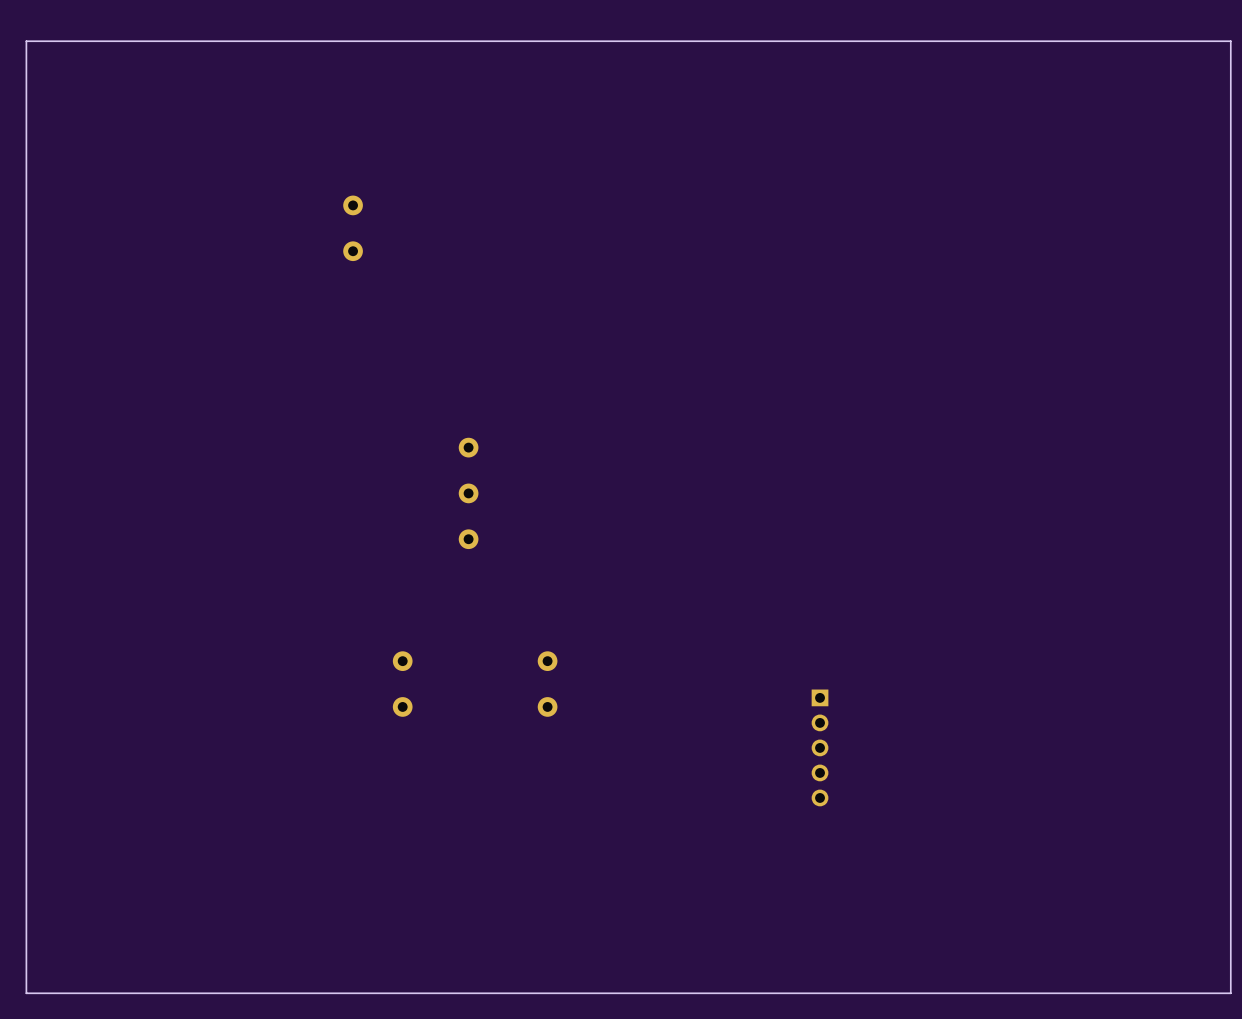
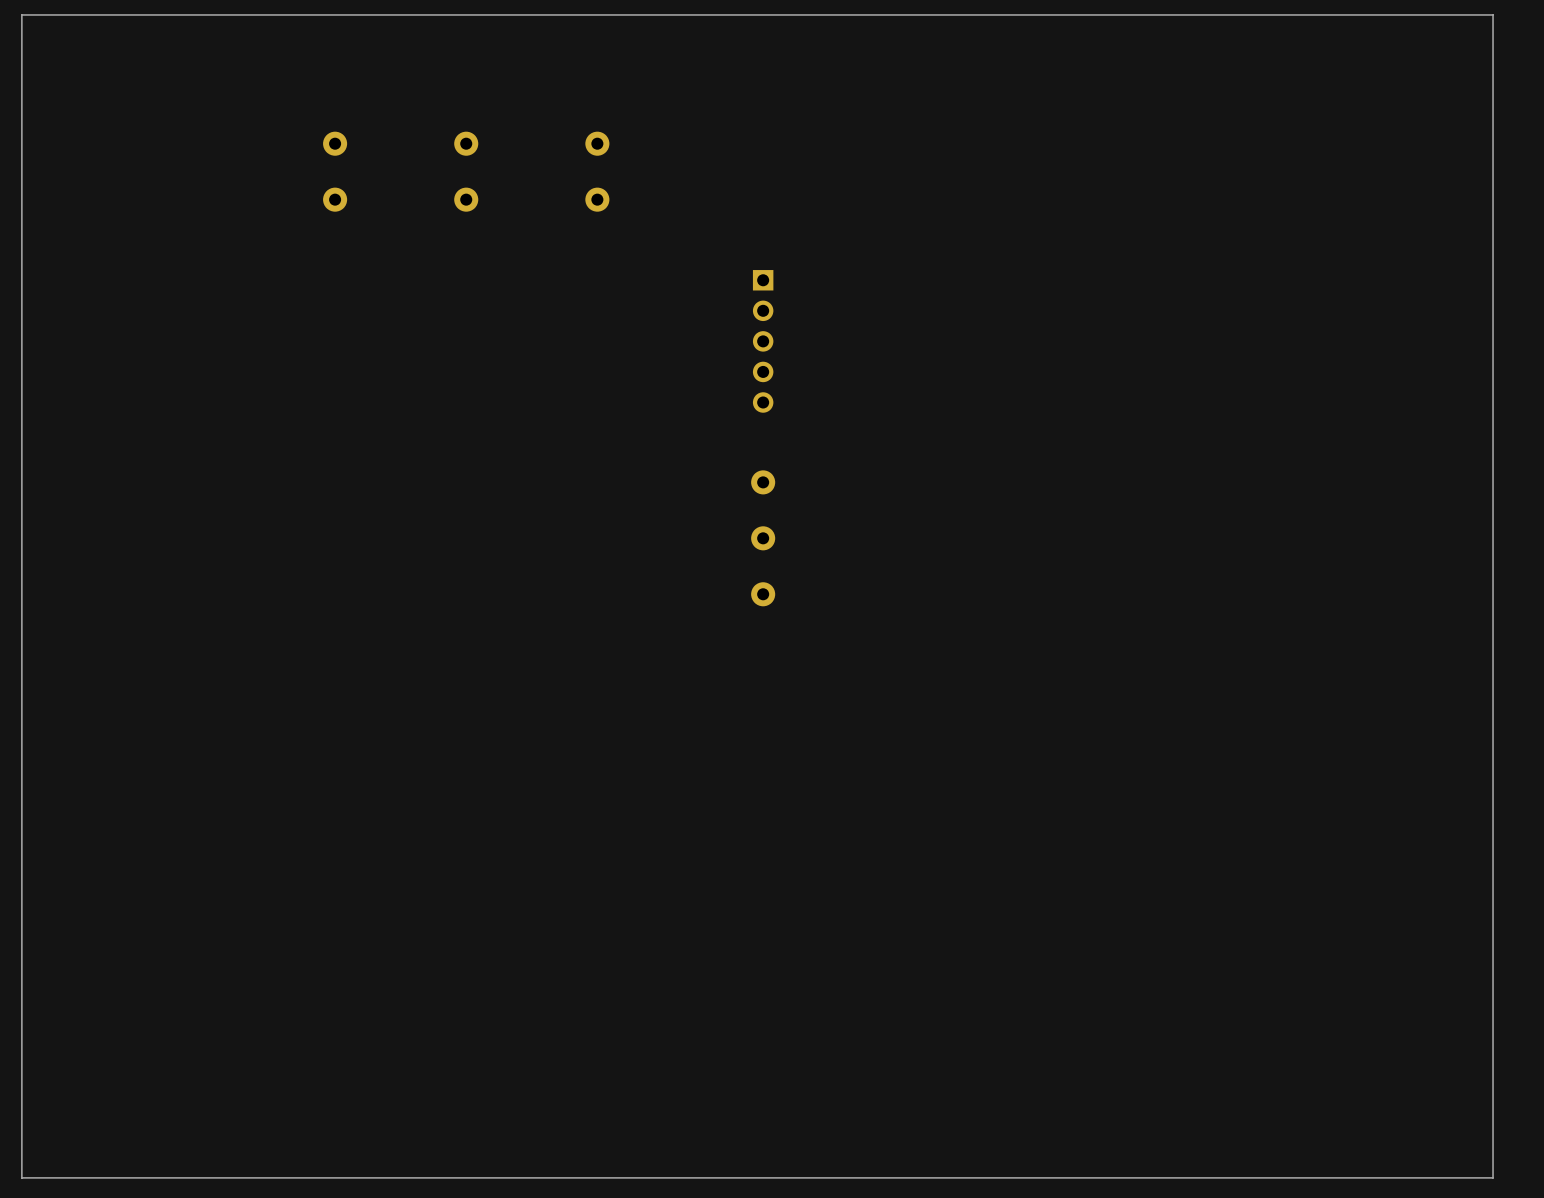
part: none -> (335, 143)
part: none -> (466, 143)
part: none -> (597, 143)
part: none -> (335, 199)
part: none -> (466, 199)
part: none -> (597, 199)
part: (353, 205) -> none
part: (353, 251) -> none
part: none -> (763, 341)
part: none -> (763, 482)
part: (468, 447) -> none
part: none -> (763, 538)
part: (468, 493) -> none
part: none -> (763, 594)
part: (468, 539) -> none
part: (402, 661) -> none
part: (547, 661) -> none
part: (402, 706) -> none
part: (547, 706) -> none
part: (820, 747) -> none

